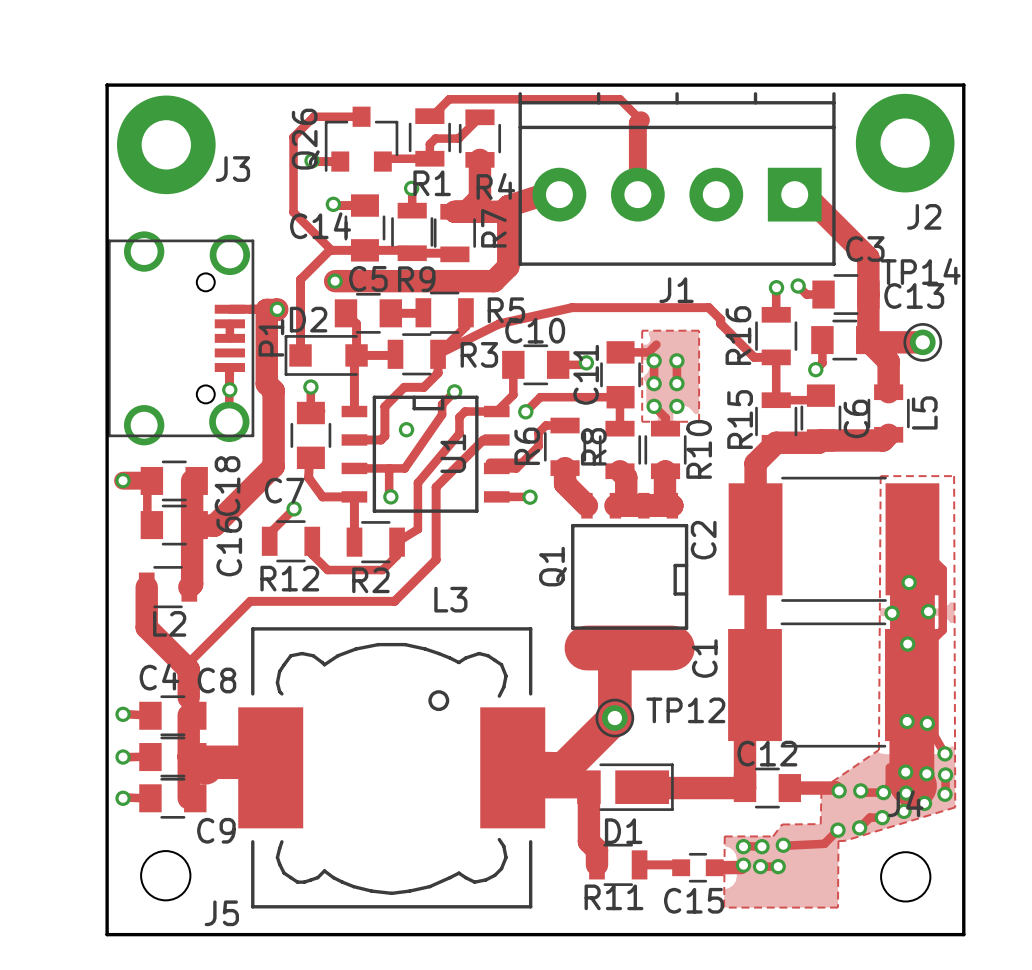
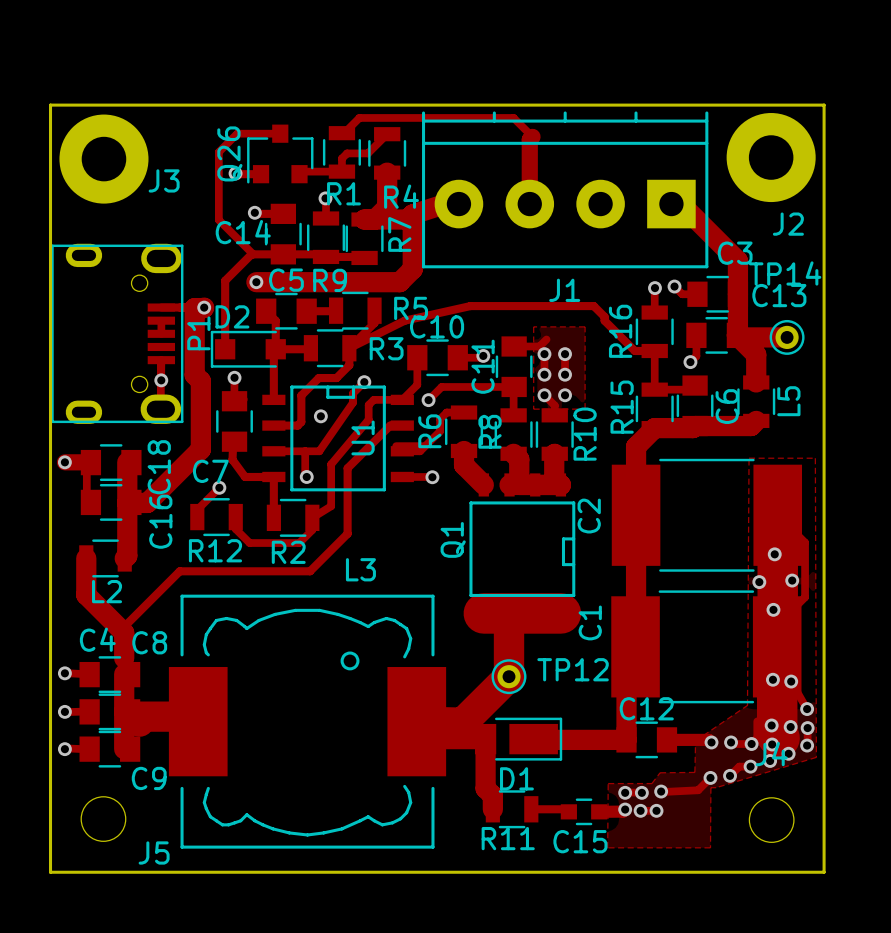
P1 footprint: [107, 231, 255, 446] -> [51, 243, 184, 424]

